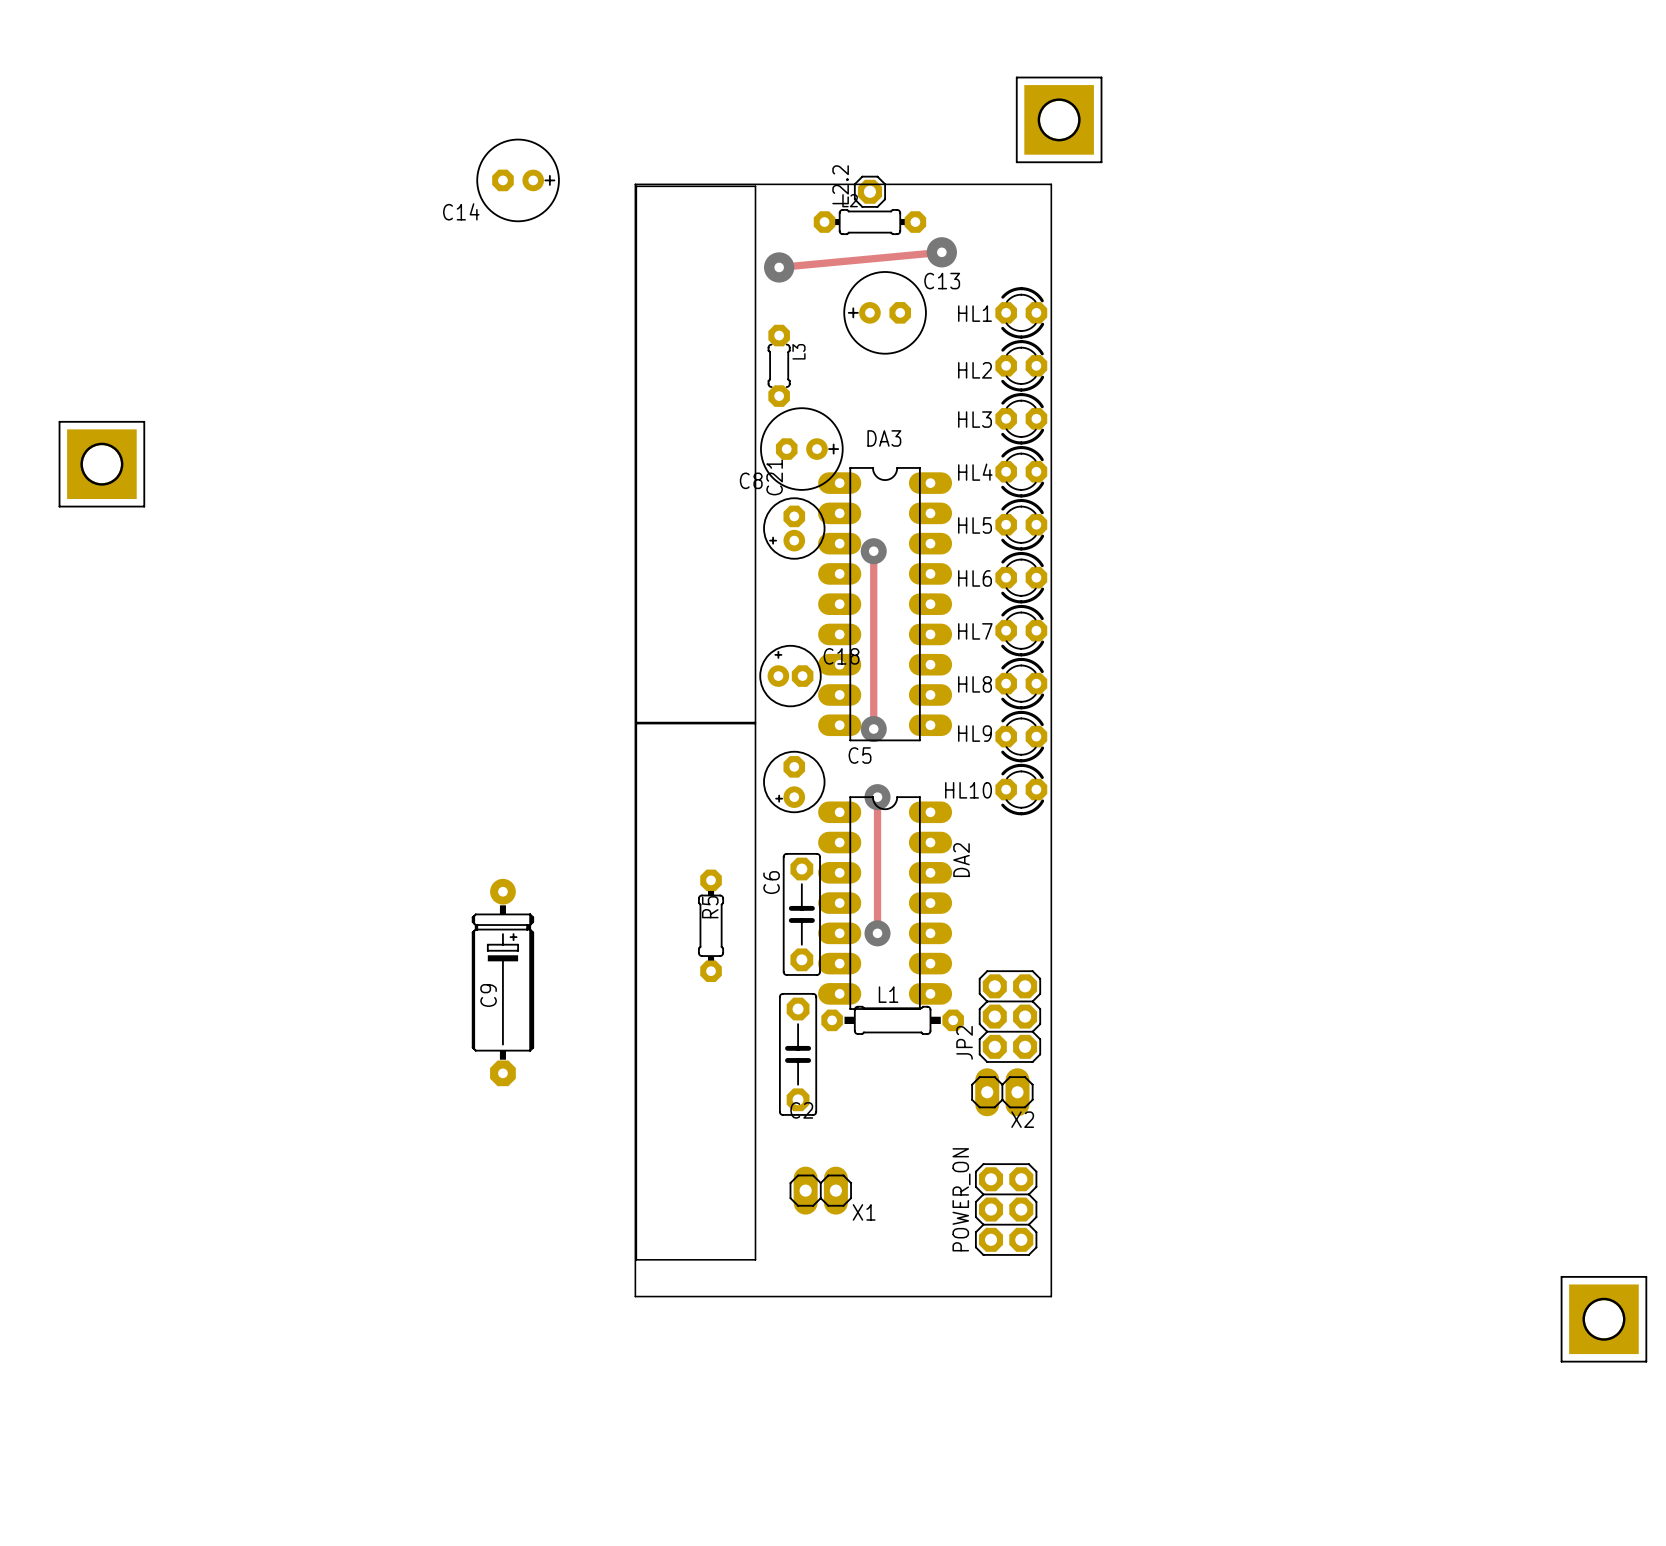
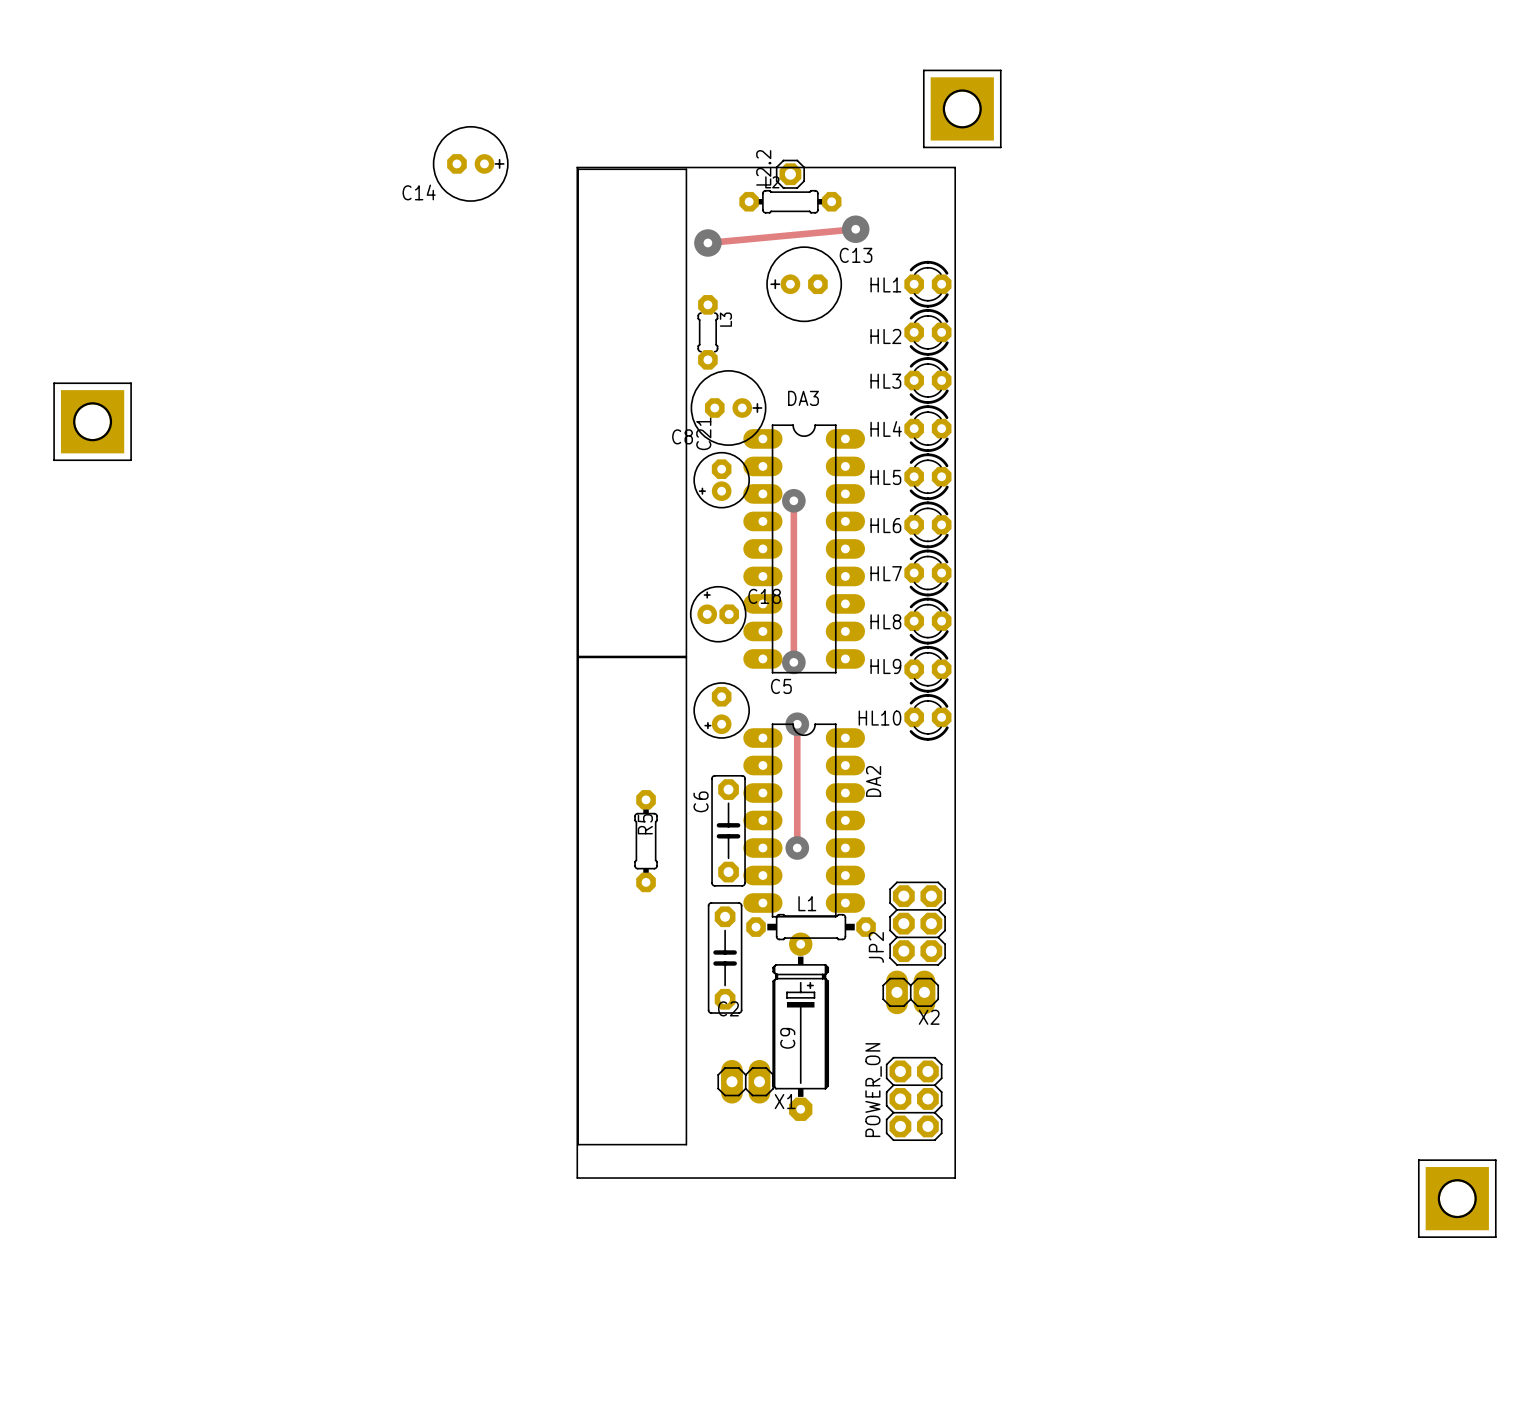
C9 position: (502, 982) -> (800, 1026)

